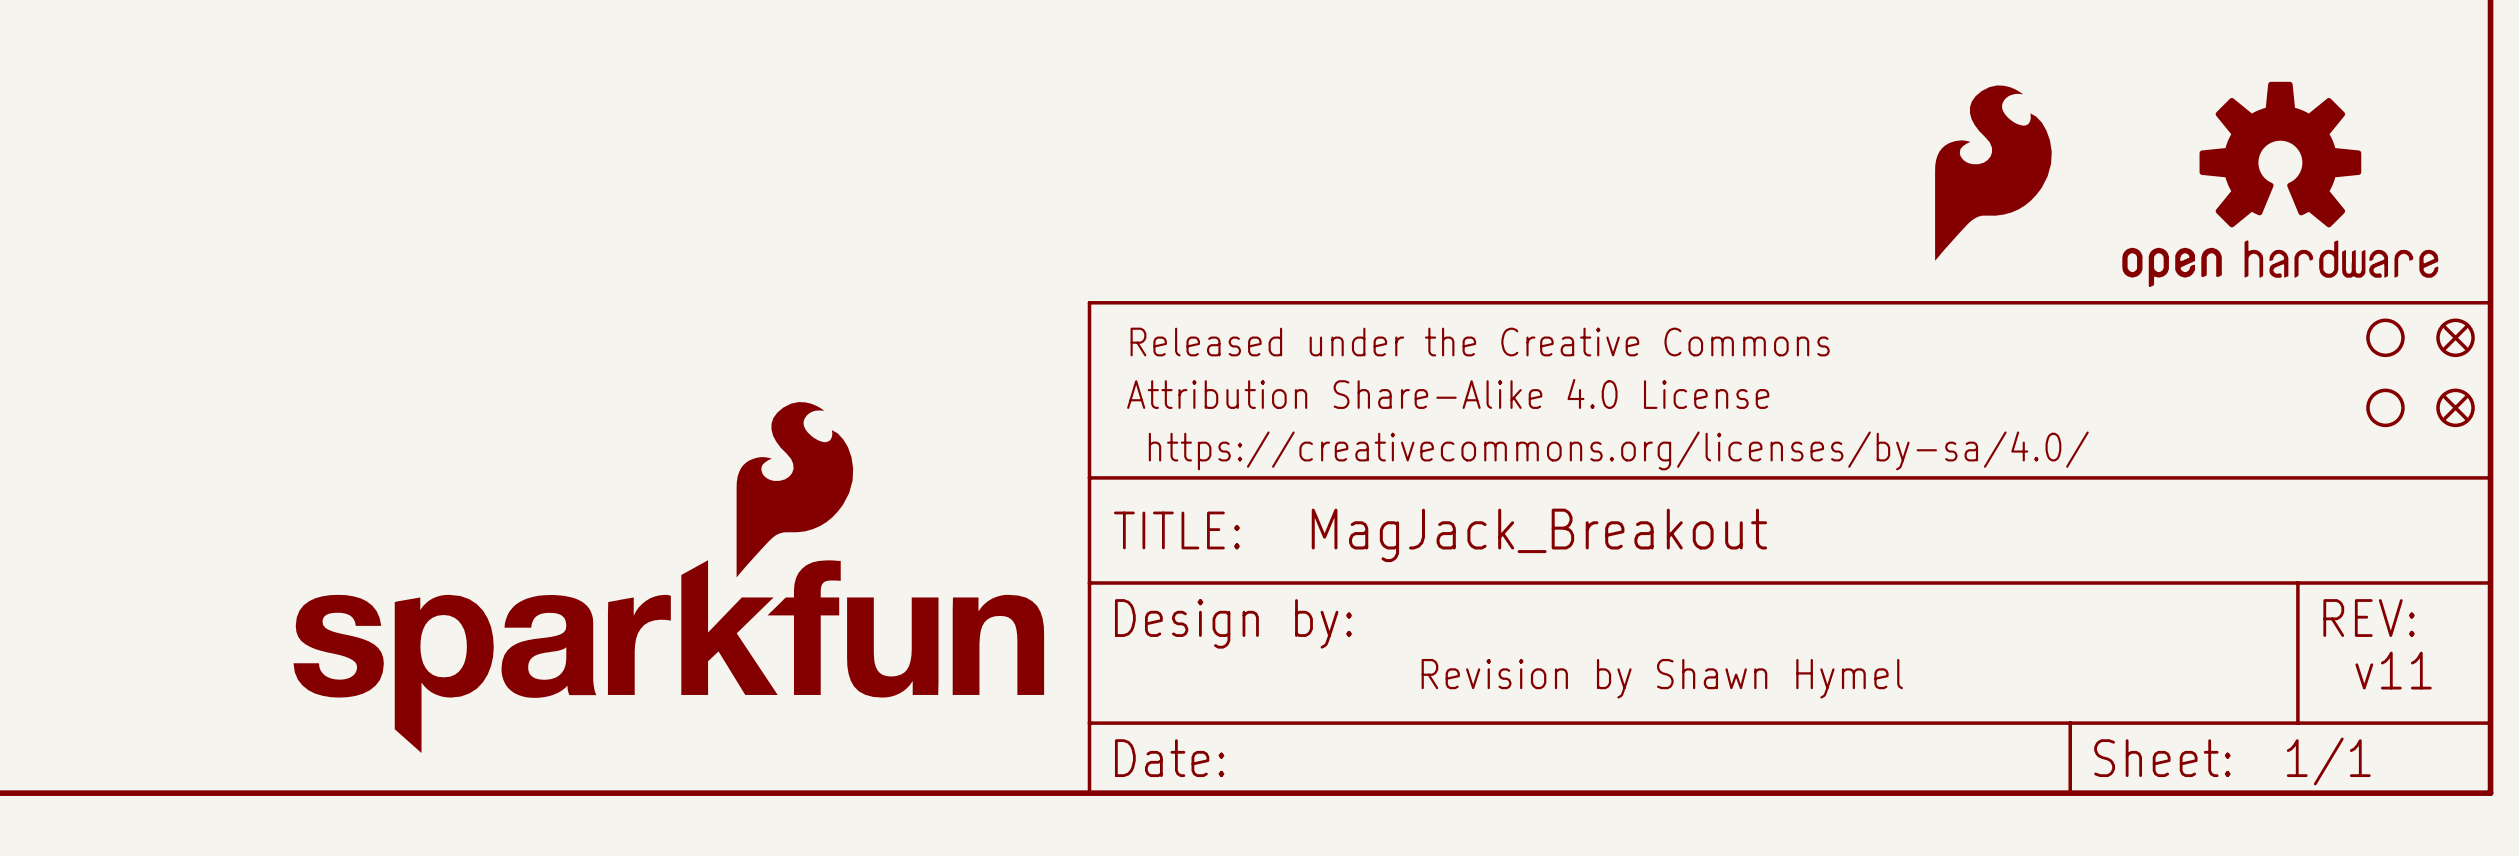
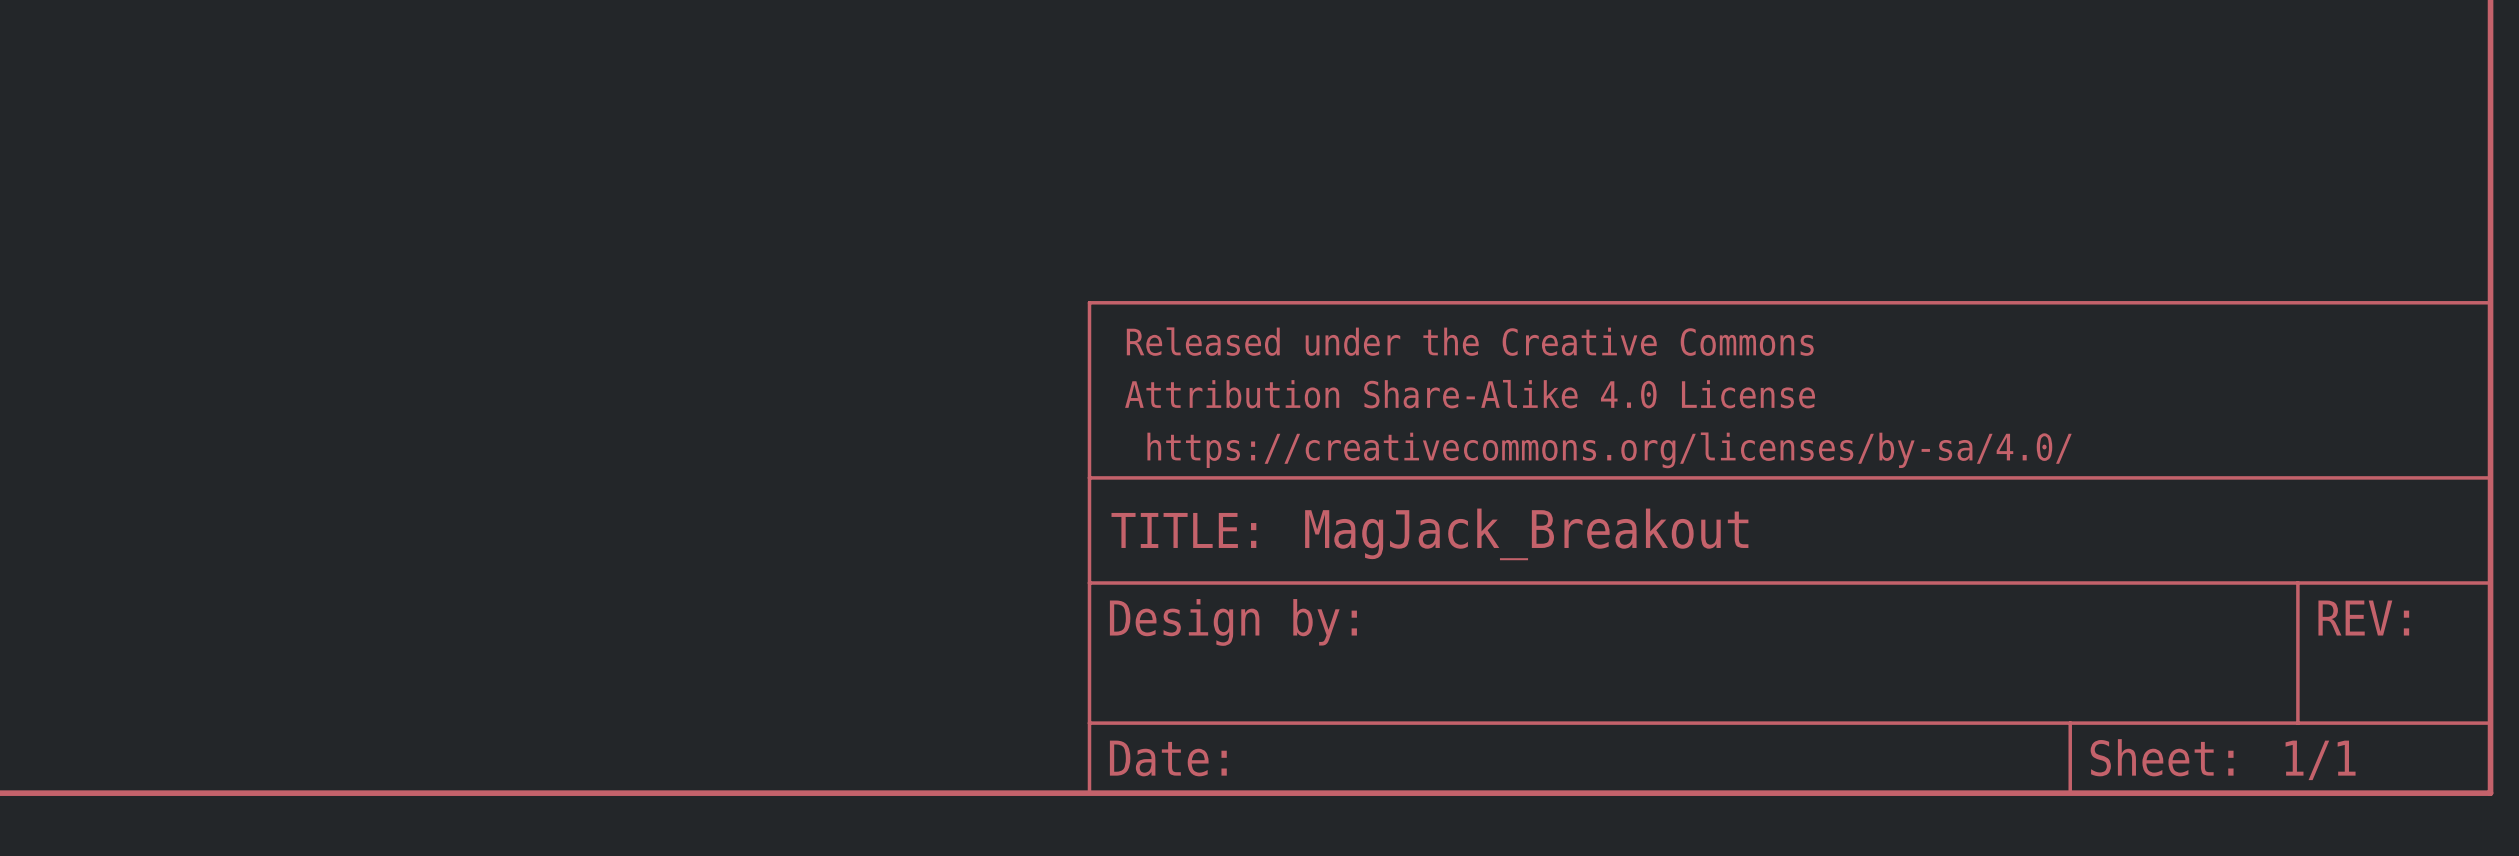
part: (1993, 173) -> none
part: (2280, 184) -> none
part: (2385, 337) -> none
part: (2455, 337) -> none
part: (2385, 407) -> none
part: (2455, 407) -> none
part: (668, 577) -> none
text: v11 (2393, 670) -> none
text: Revision by Shawn Hymel (1662, 678) -> none

